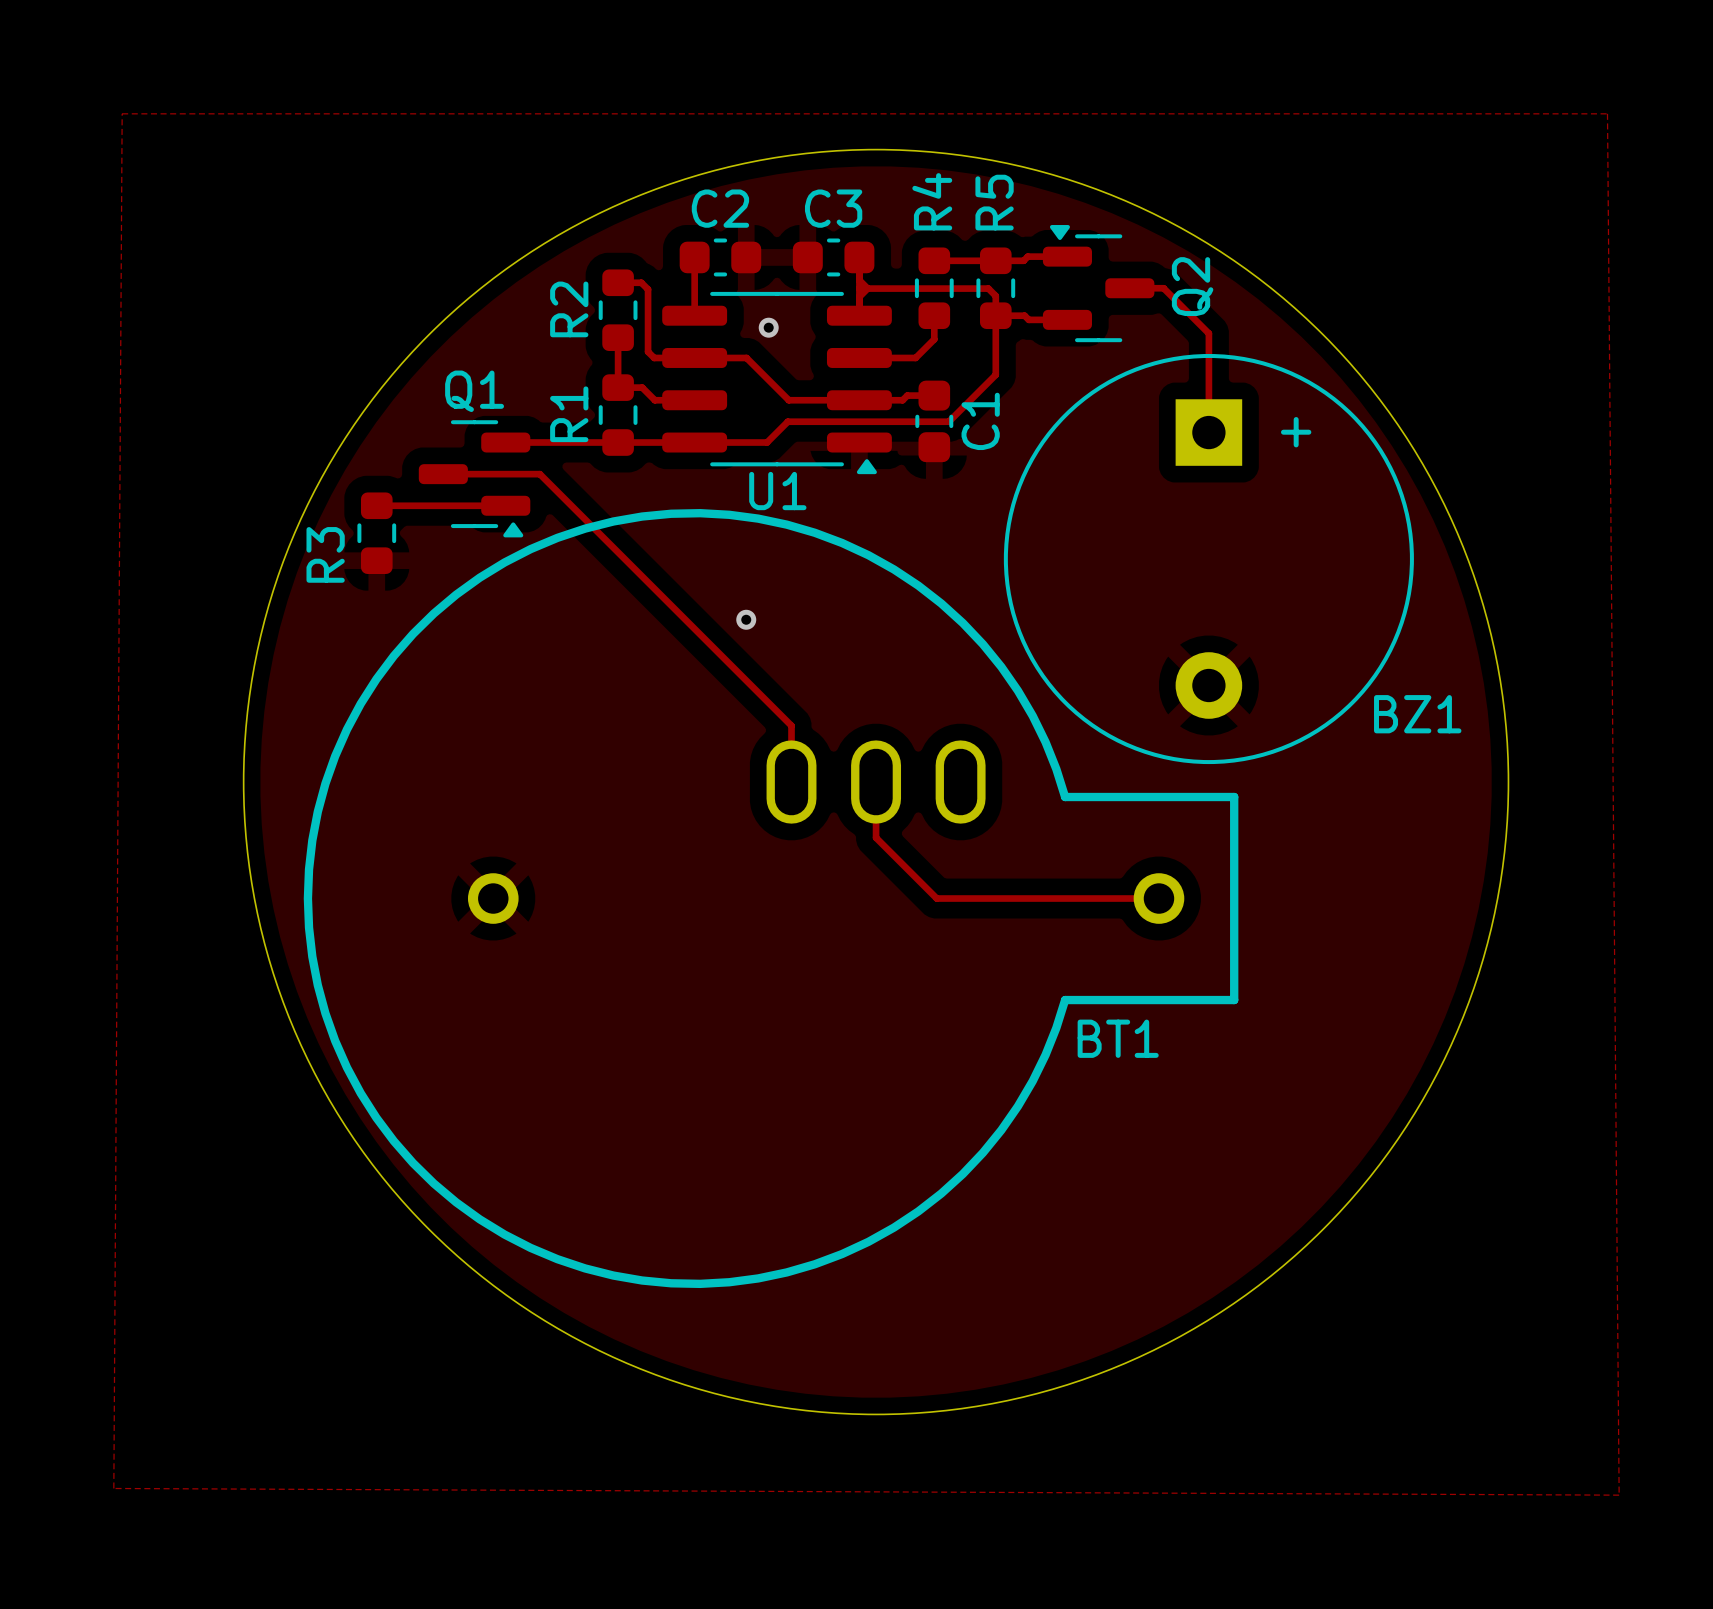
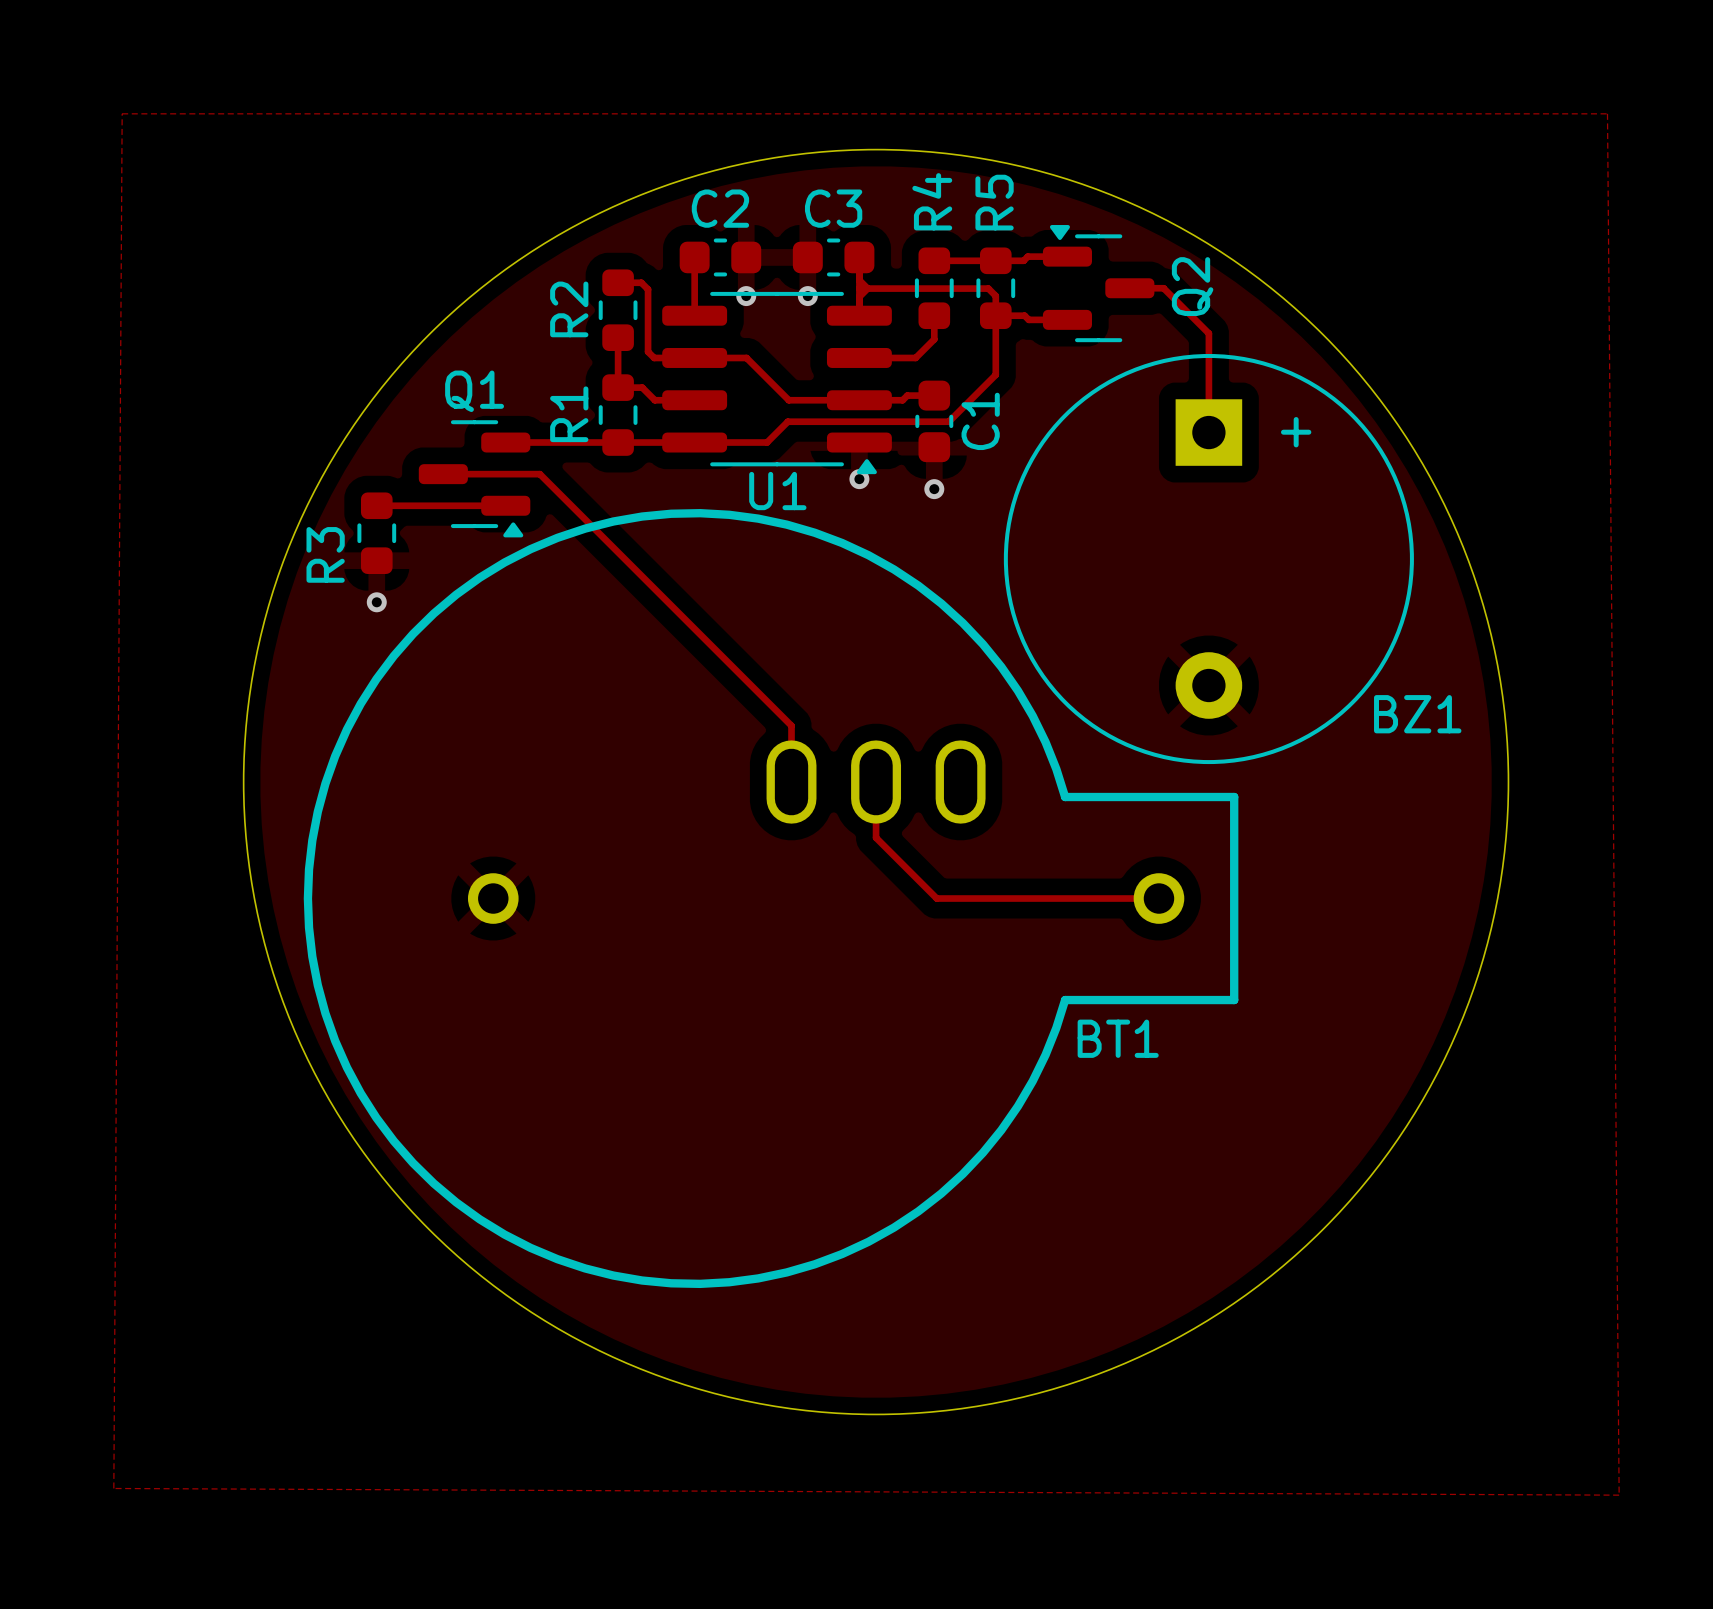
via: none -> (746, 296)
via: none -> (807, 296)
via: (768, 327) -> none
via: none -> (859, 479)
via: none -> (934, 489)
via: none -> (376, 602)
via: (746, 619) -> none

